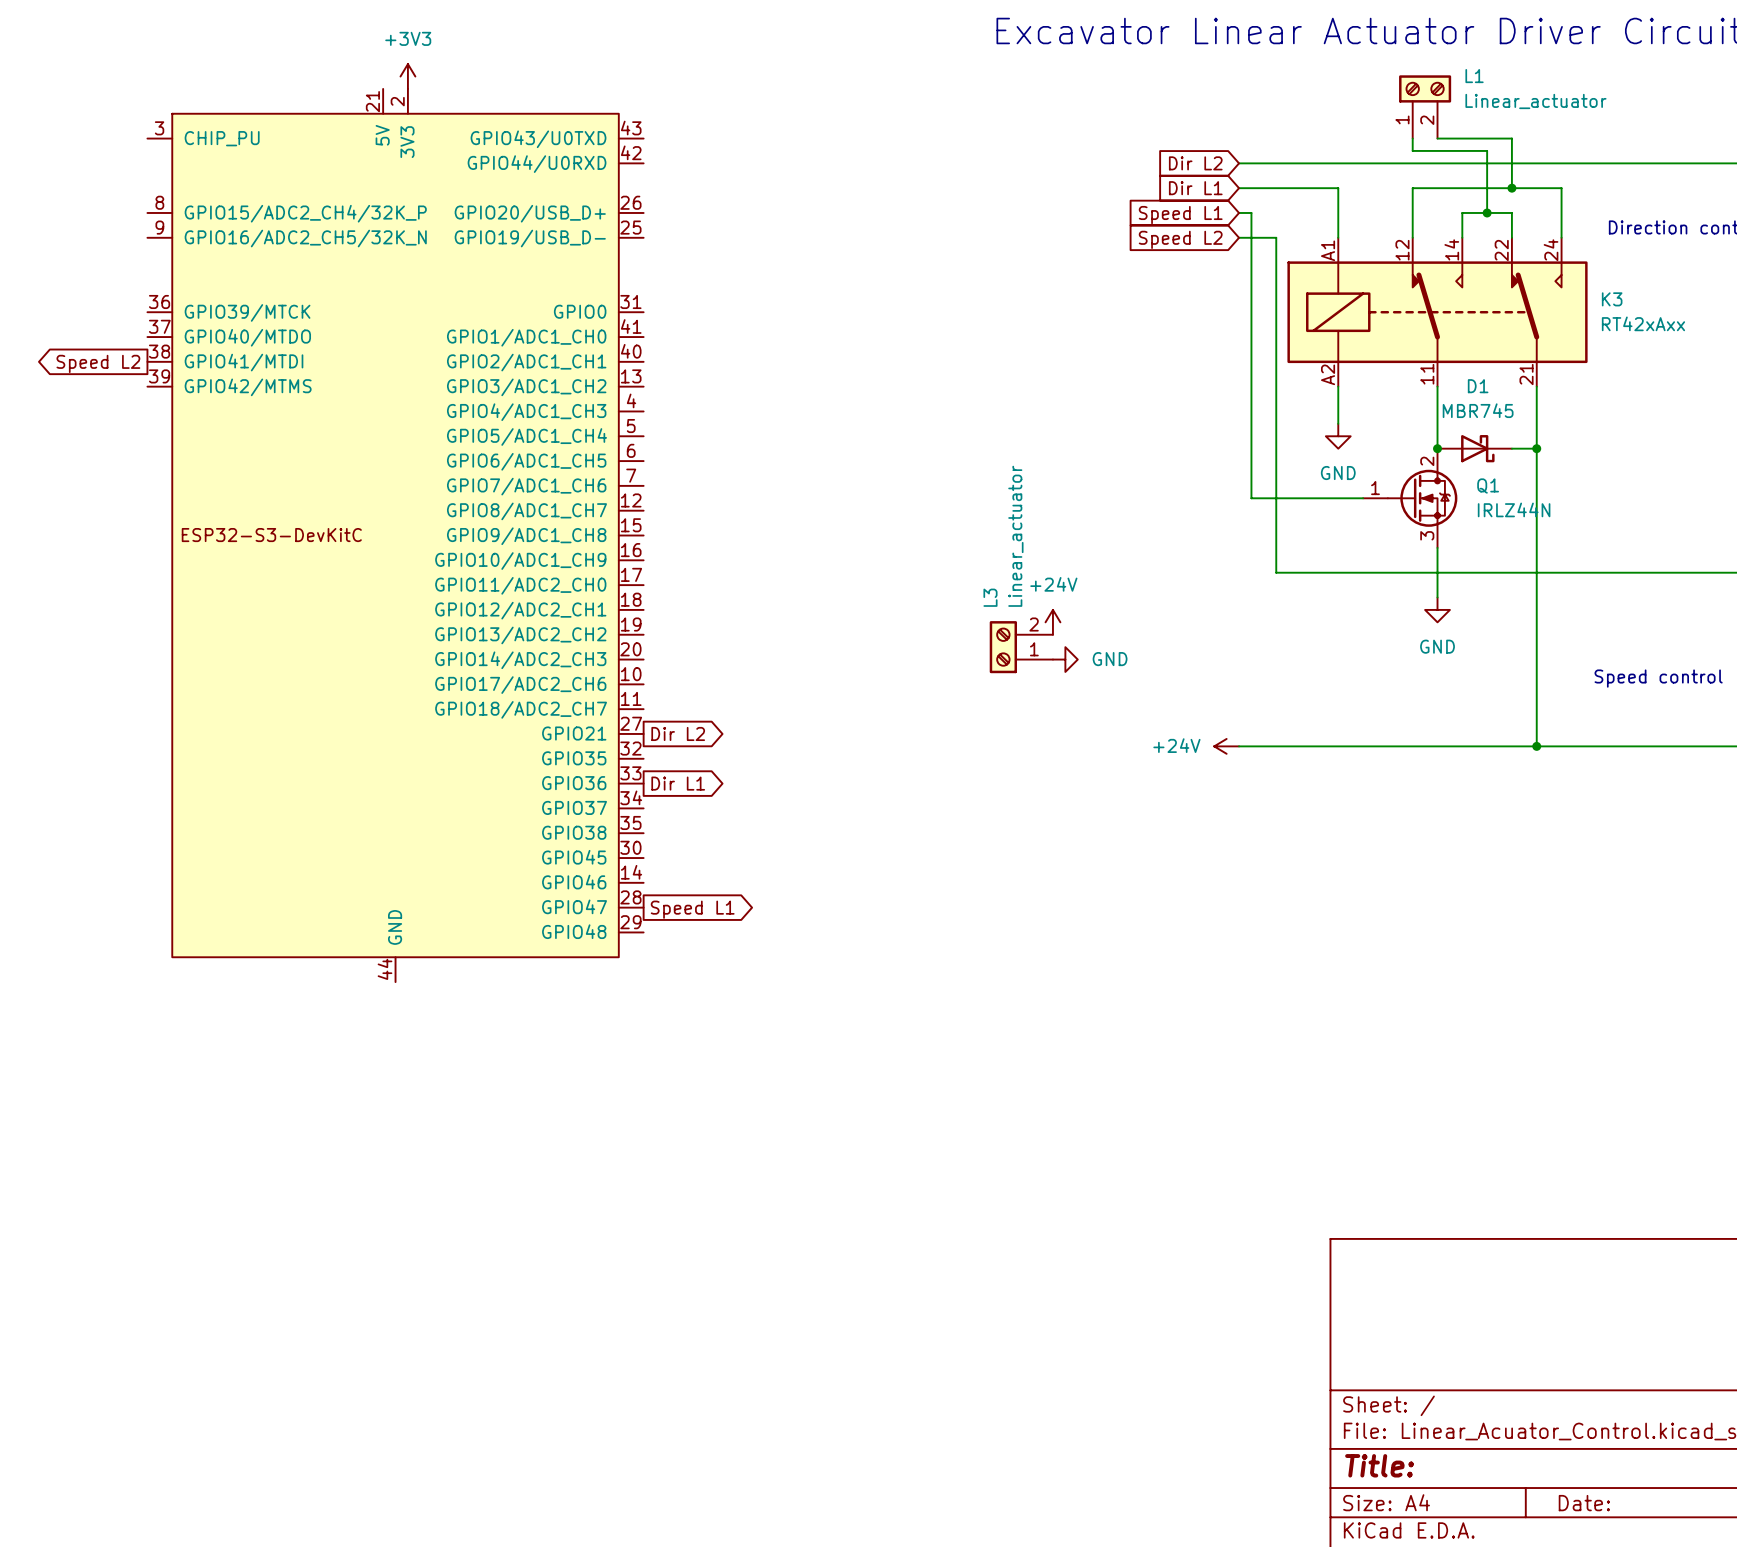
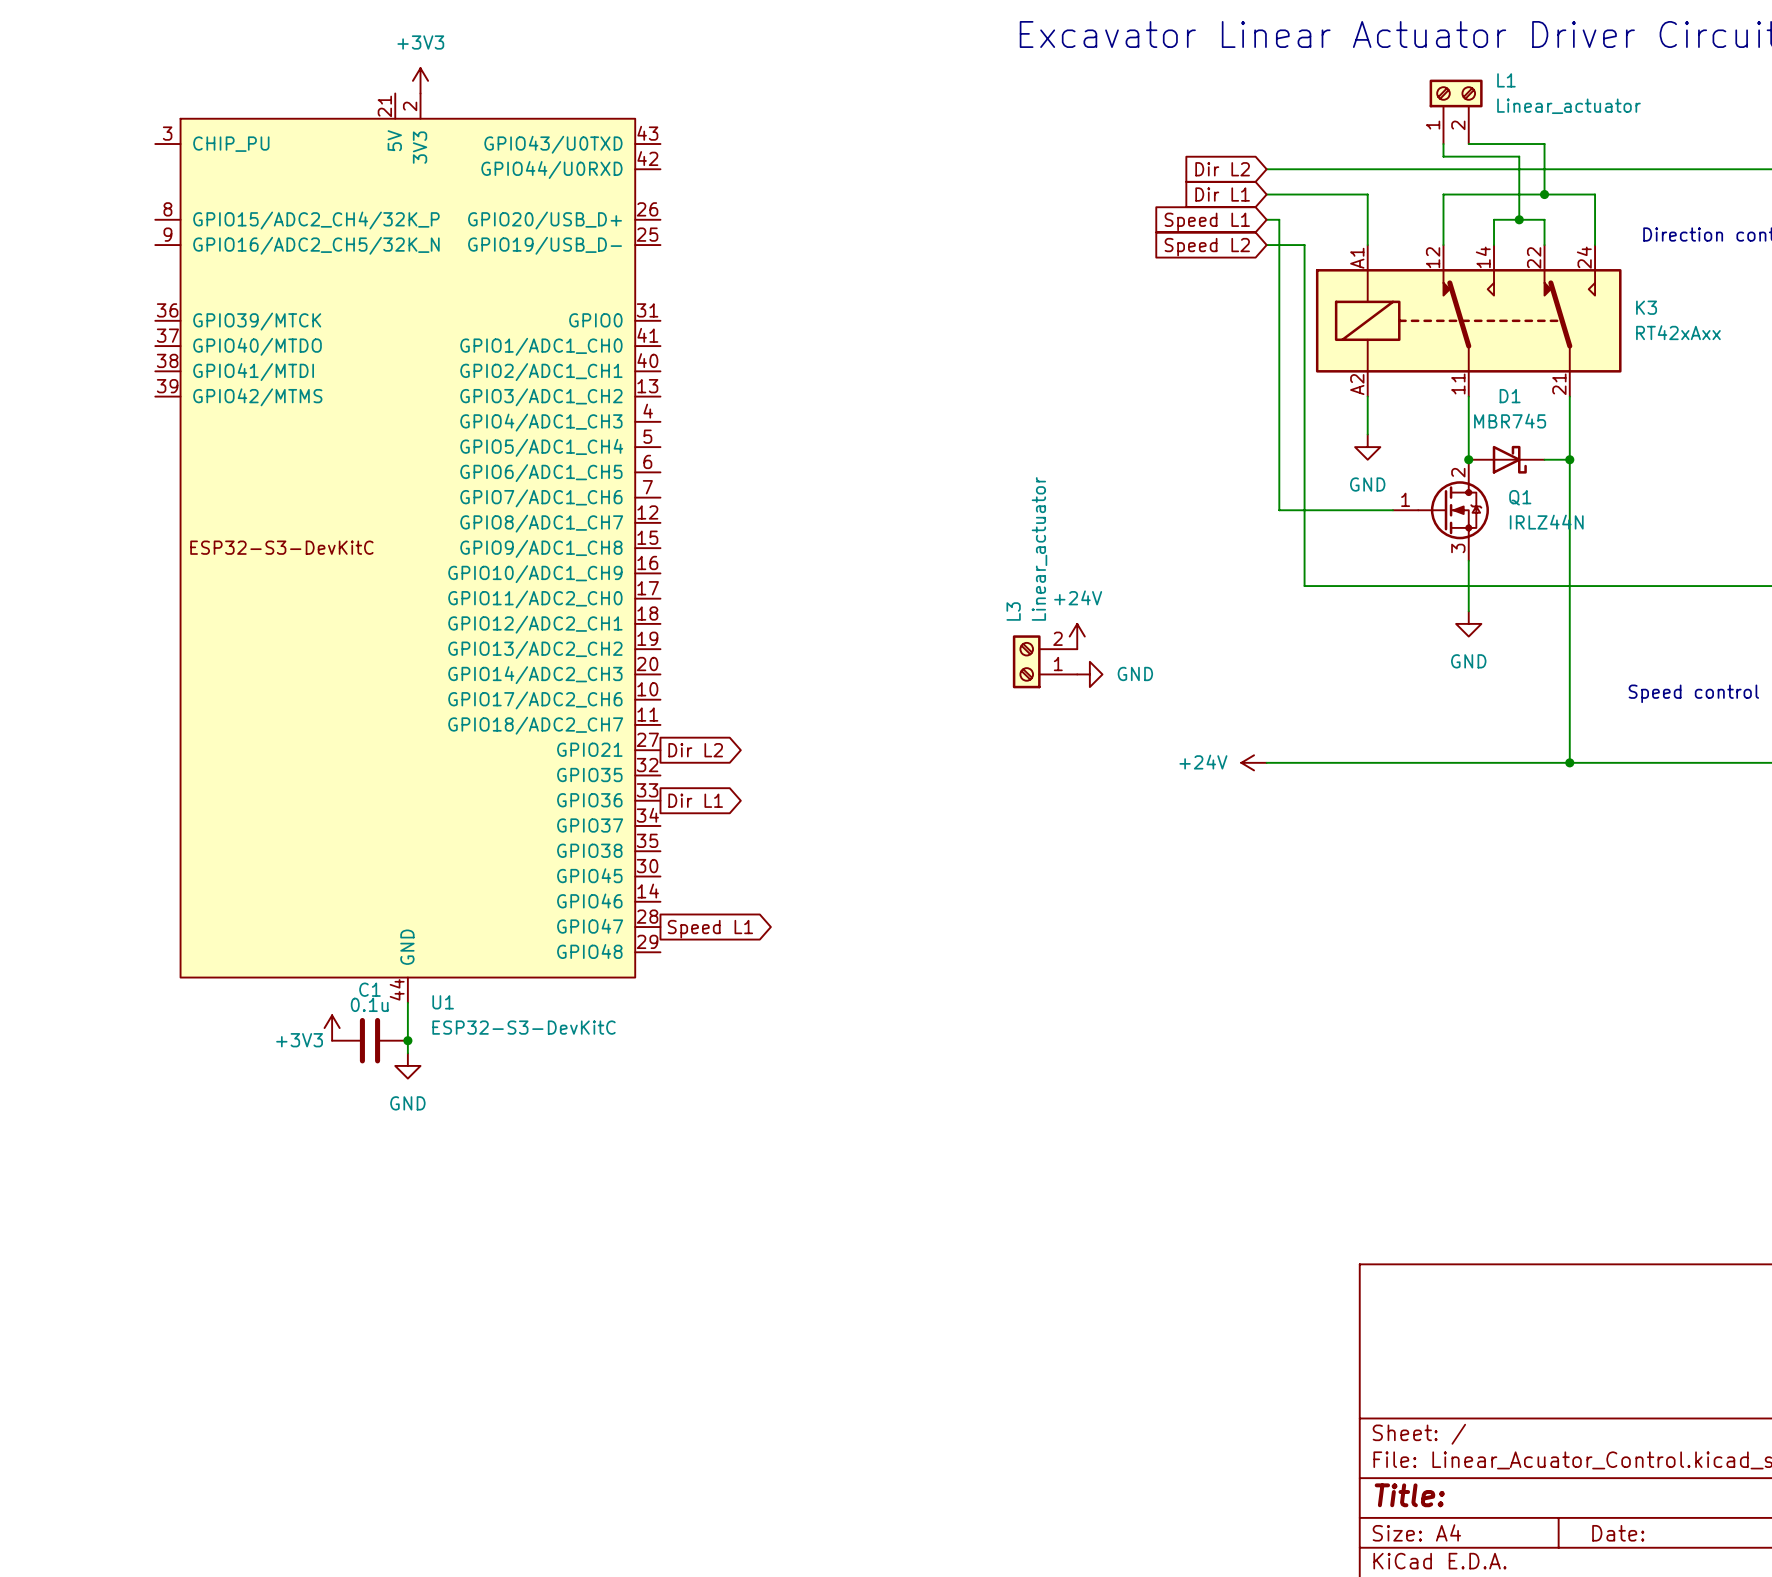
global label: Speed L2 (98, 363) -> none
U1 name: none -> U1 (443, 1002)
wire: none -> (407, 1002) (407, 1053)
power symbol: none -> +3V3 (332, 1028)
U1 value: none -> ESP32-S3-DevKitC (524, 1027)
C1: none -> 0.1u (369, 1040)
junction: none -> (407, 1040)
power symbol: none -> GND (407, 1065)

